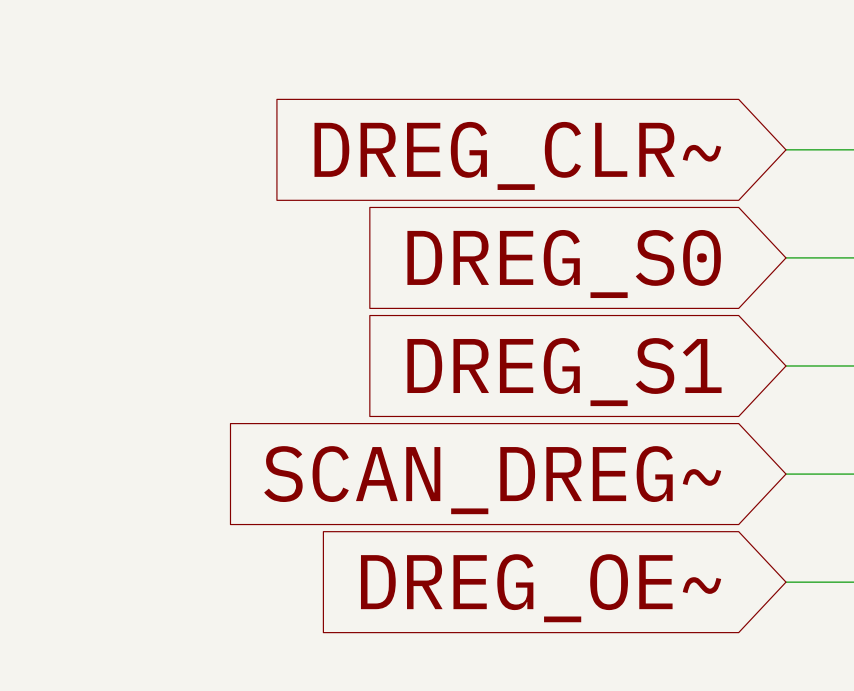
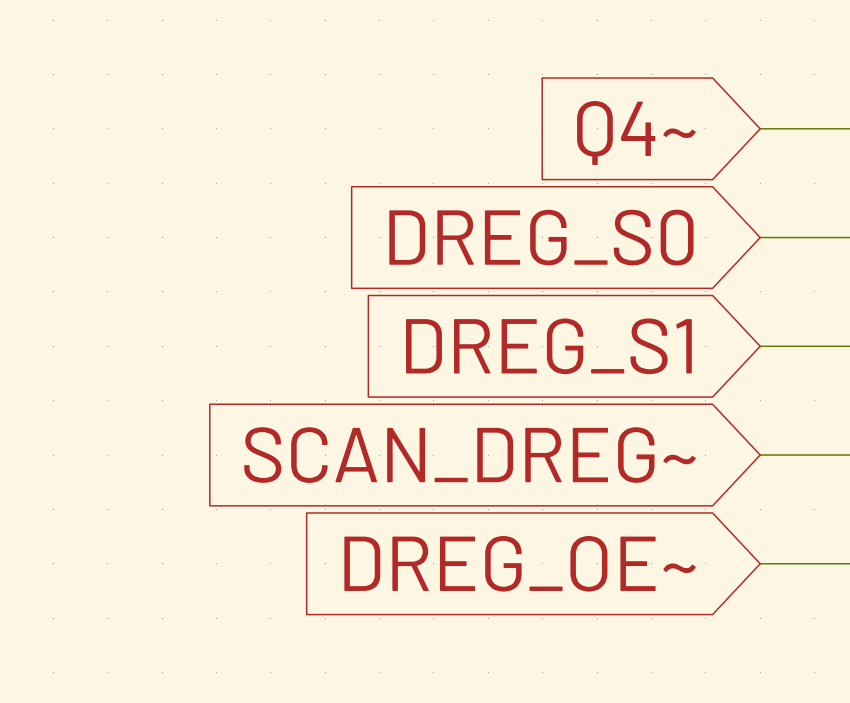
global label: DREG_CLR~ (517, 155) -> Q4~ (636, 132)

